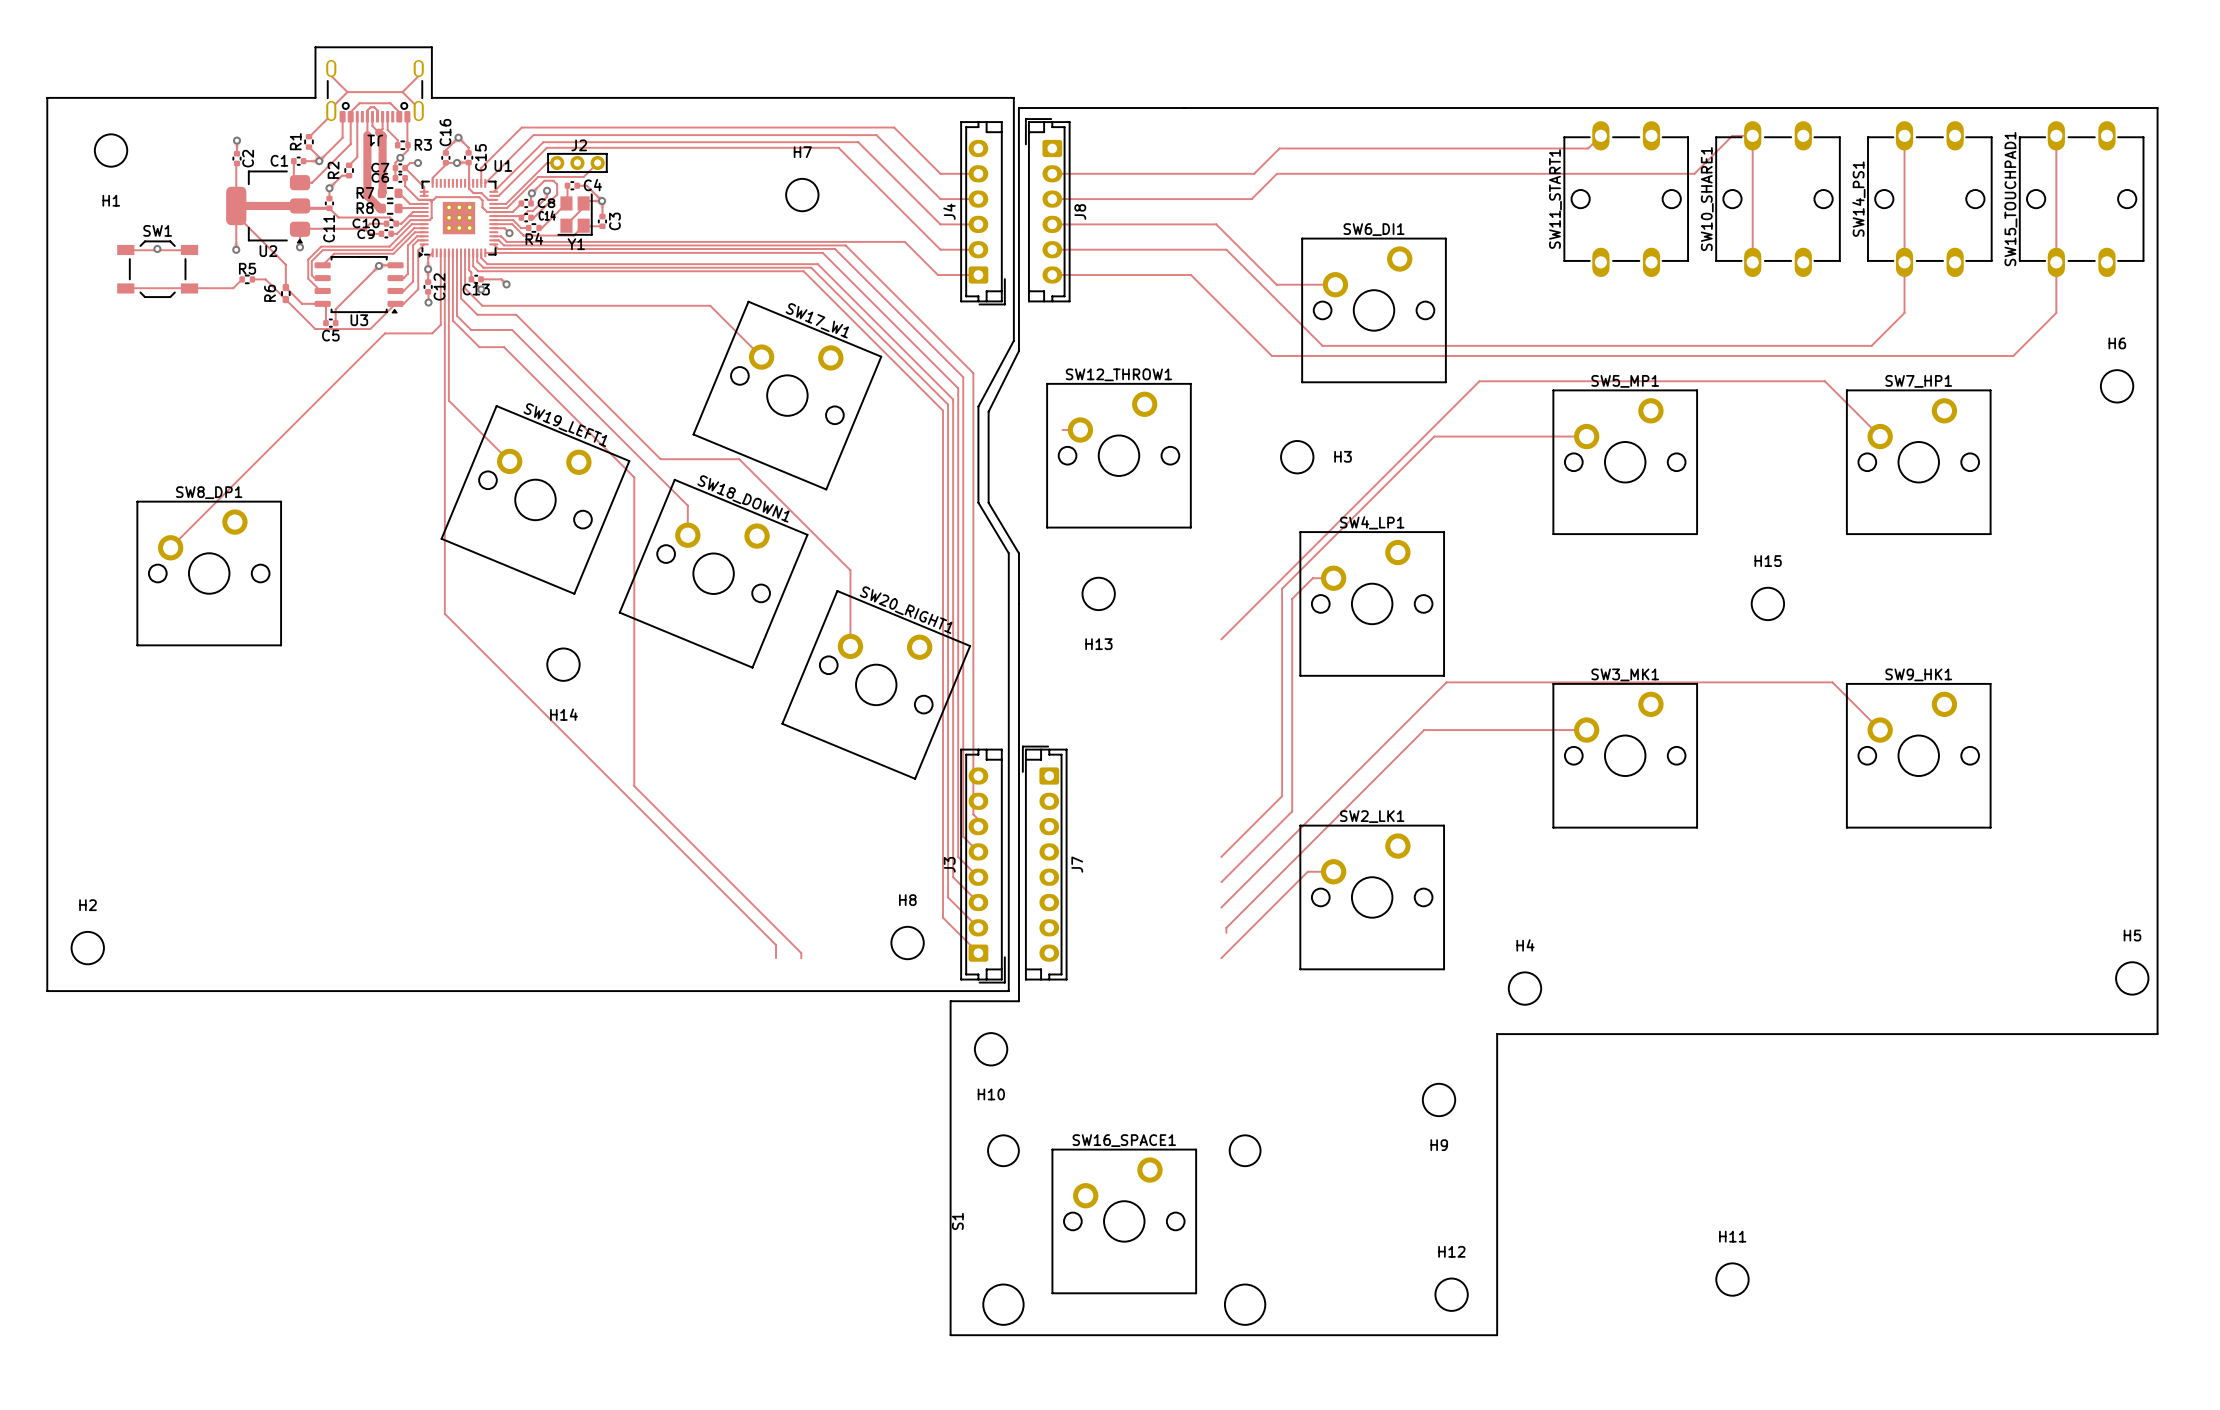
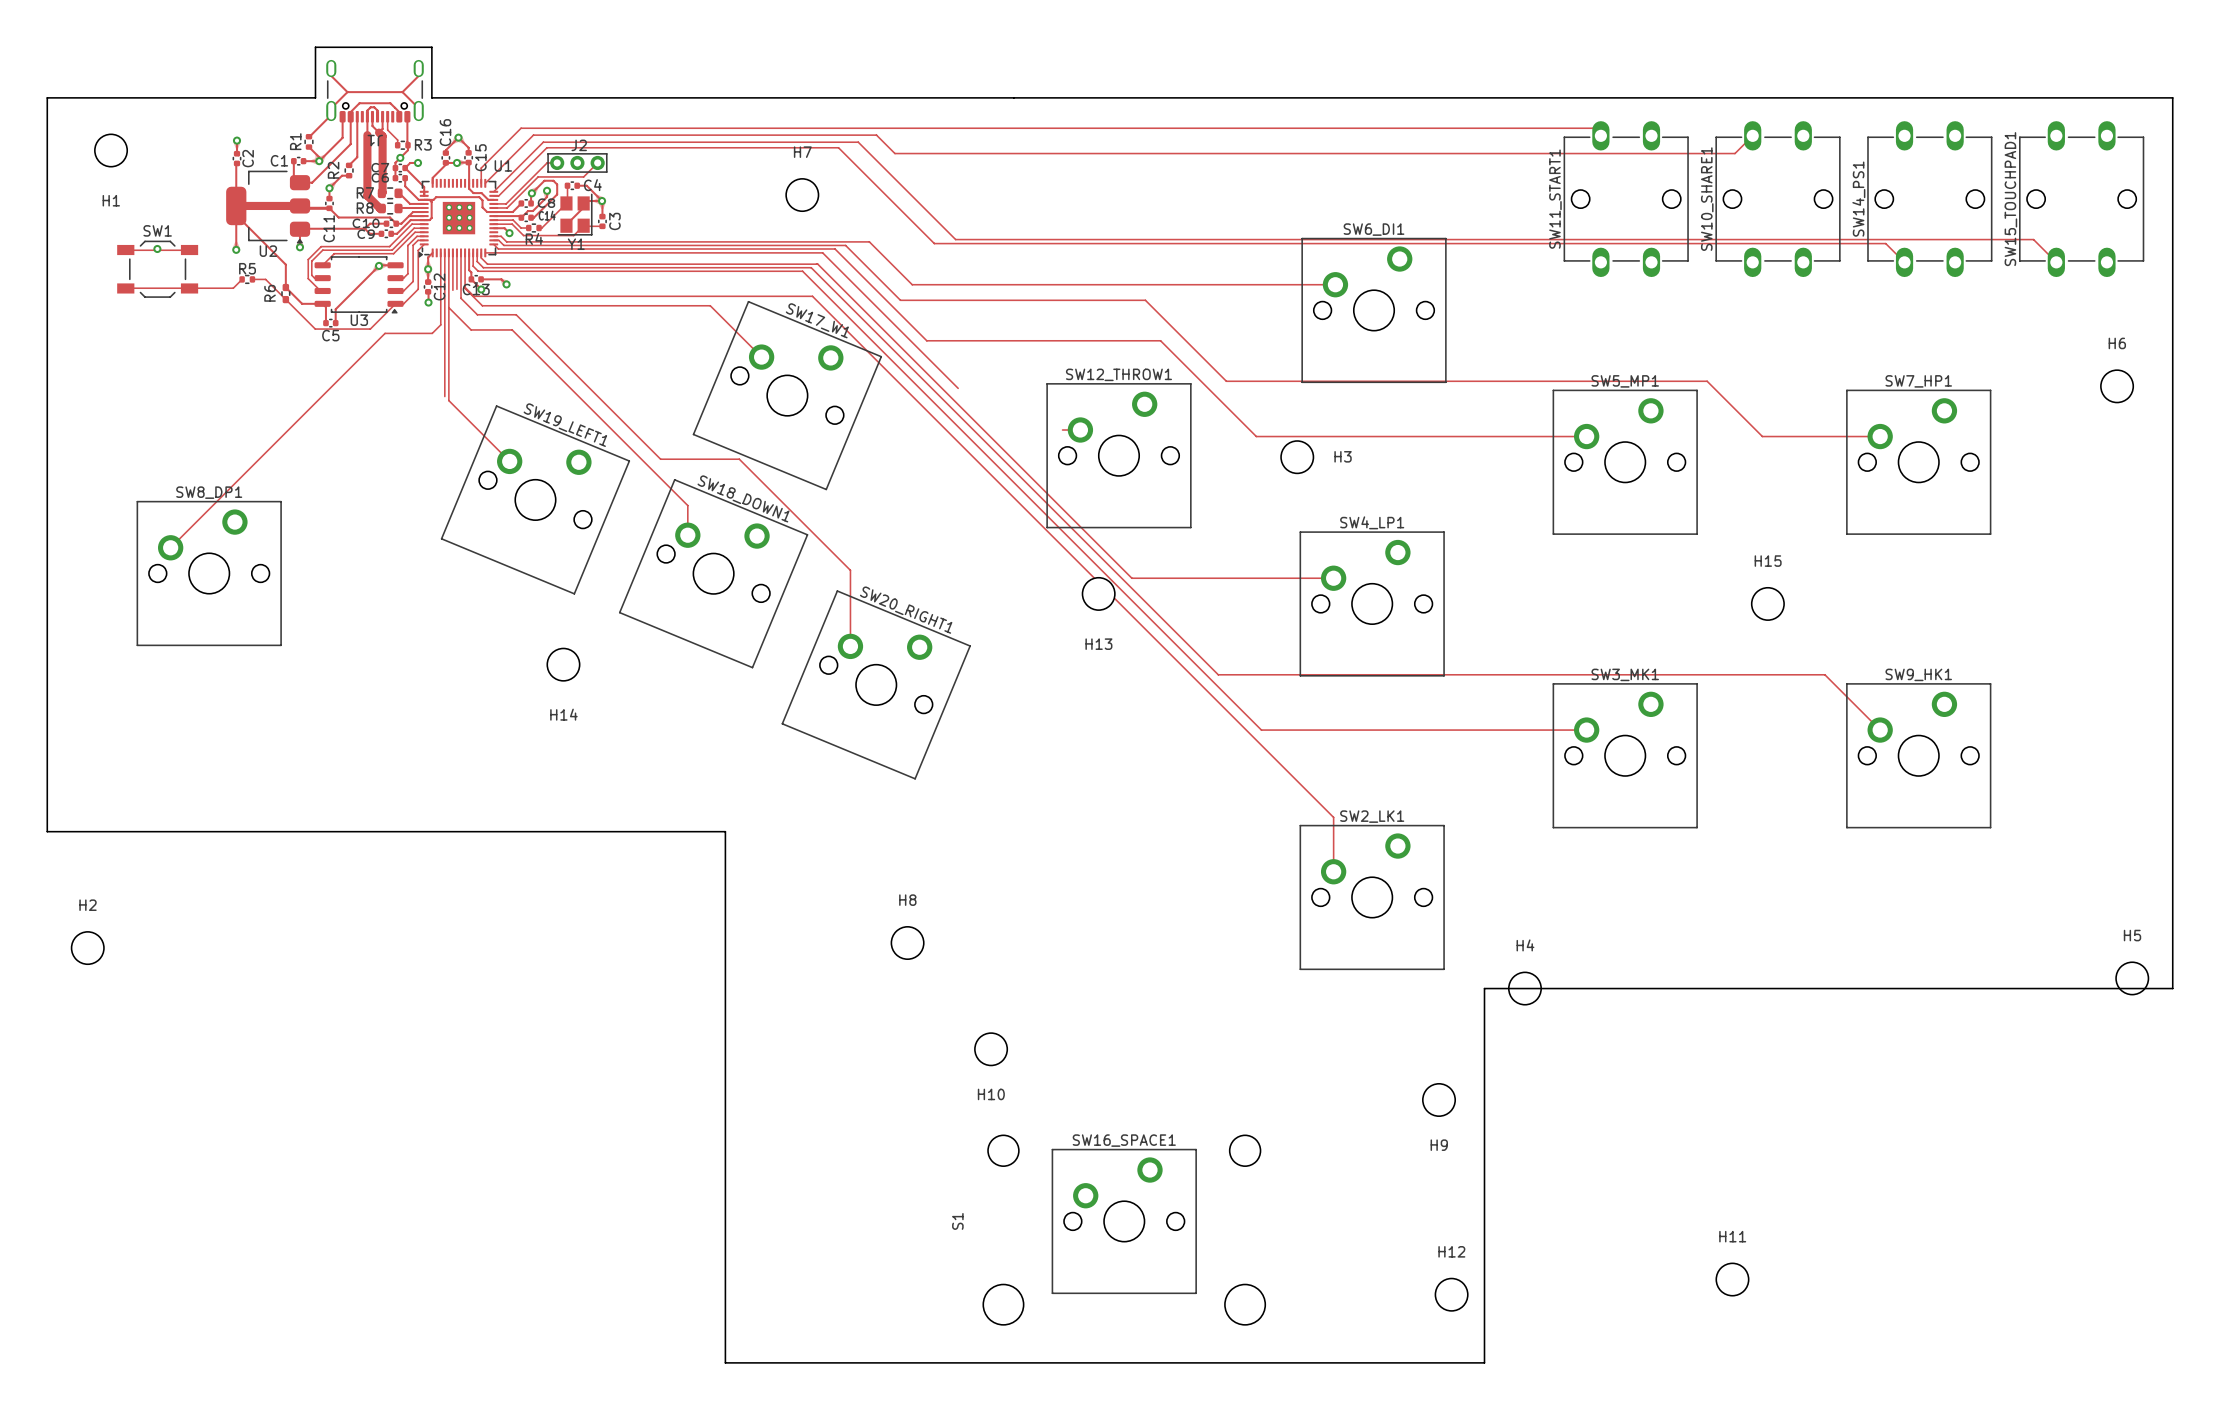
board edge: (1013, 97) (1013, 340) (978, 406) (978, 502) (1008, 553) (1008, 991) (47, 991) (47, 831) -> (1013, 97) (2172, 97) (2172, 988) (1484, 988) (1484, 1362) (725, 1362) (725, 831) (47, 831)
board edge: (1018, 108) (1018, 351) (988, 411) (988, 502) (1018, 553) (1018, 1001) (950, 1001) (950, 1335) (1497, 1335) (1497, 1034) (2157, 1034) (2157, 108) (1018, 108) -> none
track: (521, 128) (894, 127) (940, 173) (978, 173) -> none
track: (1600, 135) (1588, 148) (1279, 148) (1254, 173) (1052, 173) -> (1600, 135) (1593, 128) (521, 128)
track: (1904, 135) (1904, 312) (1871, 345) (1322, 345) (1226, 249) (1052, 249) -> none
track: (2056, 135) (2056, 312) (2013, 355) (1271, 355) (1190, 275) (1052, 275) -> none
track: (894, 153) (940, 199) (978, 199) -> (894, 153) (1735, 153) (1752, 135)
track: (1052, 199) (1251, 199) (1277, 173) (1694, 173) (1732, 135) (1752, 135) (1752, 262) -> none
J8: (1047, 210) -> none
J4: (982, 213) -> none
track: (940, 224) (978, 224) -> (940, 224) (955, 239) (2033, 239) (2056, 262)
track: (1052, 224) (1216, 224) (1276, 284) -> (869, 241) (912, 284) (1276, 284)
track: (869, 241) (904, 241) (937, 275) (978, 275) -> none
track: (934, 243) (940, 249) (978, 249) -> (934, 243) (1885, 243) (1904, 262)
track: (802, 271) (943, 410) (943, 917) (978, 953) -> (802, 271) (1261, 730) (1424, 730)
track: (456, 289) (456, 315) -> (448, 307) (456, 315)
track: (452, 290) (452, 320) (479, 347) (504, 347) (634, 477) (634, 786) (801, 953) (801, 958) -> none
track: (900, 300) (973, 373) (973, 814) (978, 819) (978, 826) -> none
track: (926, 340) (963, 377) (963, 836) (978, 851) -> none
track: (1479, 381) (1221, 639) -> (1479, 381) (1226, 381) (1145, 300) (900, 300)
track: (1707, 381) (1824, 381) (1880, 436) -> (1707, 381) (1762, 436) (1880, 436)
track: (958, 388) (958, 856) (978, 877) -> none
track: (444, 396) (444, 613) (776, 945) (776, 958) -> none
track: (953, 399) (953, 877) (978, 902) -> (953, 399) (1131, 578) (1312, 578)
track: (948, 404) (948, 897) (978, 927) -> none
track: (1434, 436) (1282, 588) (1282, 796) (1221, 856) -> (1434, 436) (1256, 436) (1160, 340) (926, 340)
track: (1312, 578) (1292, 598) (1292, 811) (1221, 882) -> none
track: (1832, 682) (1446, 682) (1221, 907) -> (1832, 682) (1824, 674) (1218, 674) (948, 404)
track: (1424, 730) (1226, 927) (1226, 932) -> none
J7: (1044, 863) -> none
J3: (982, 866) -> none
track: (1333, 871) (1307, 871) (1221, 958) -> (1333, 871) (1333, 817) (812, 296) (473, 296) (465, 287)

